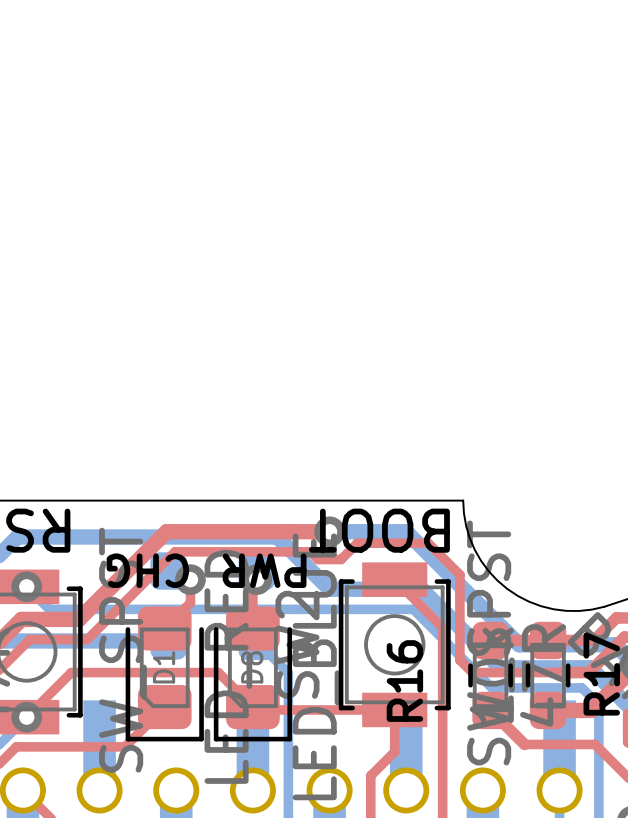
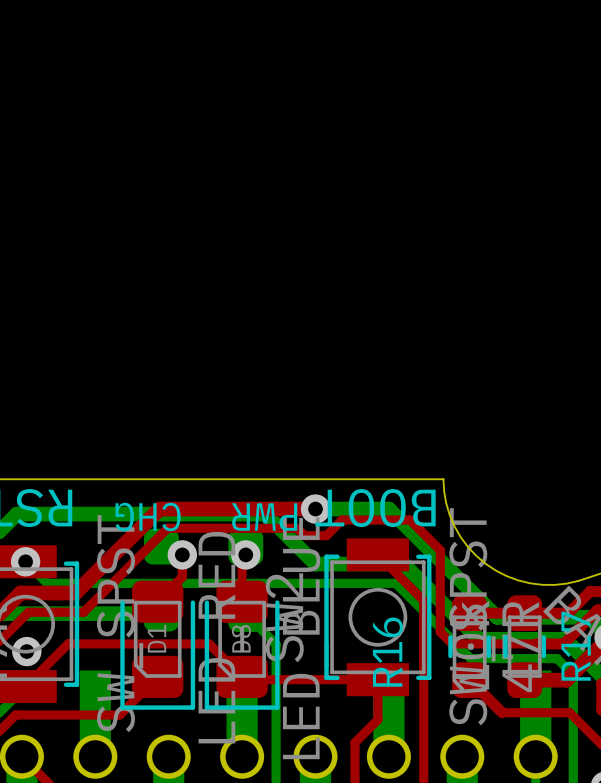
text position: CHG (147, 570) -> CHG (148, 517)
text position: PWR (264, 570) -> PWR (264, 517)
via position: (26, 717) -> (26, 651)

